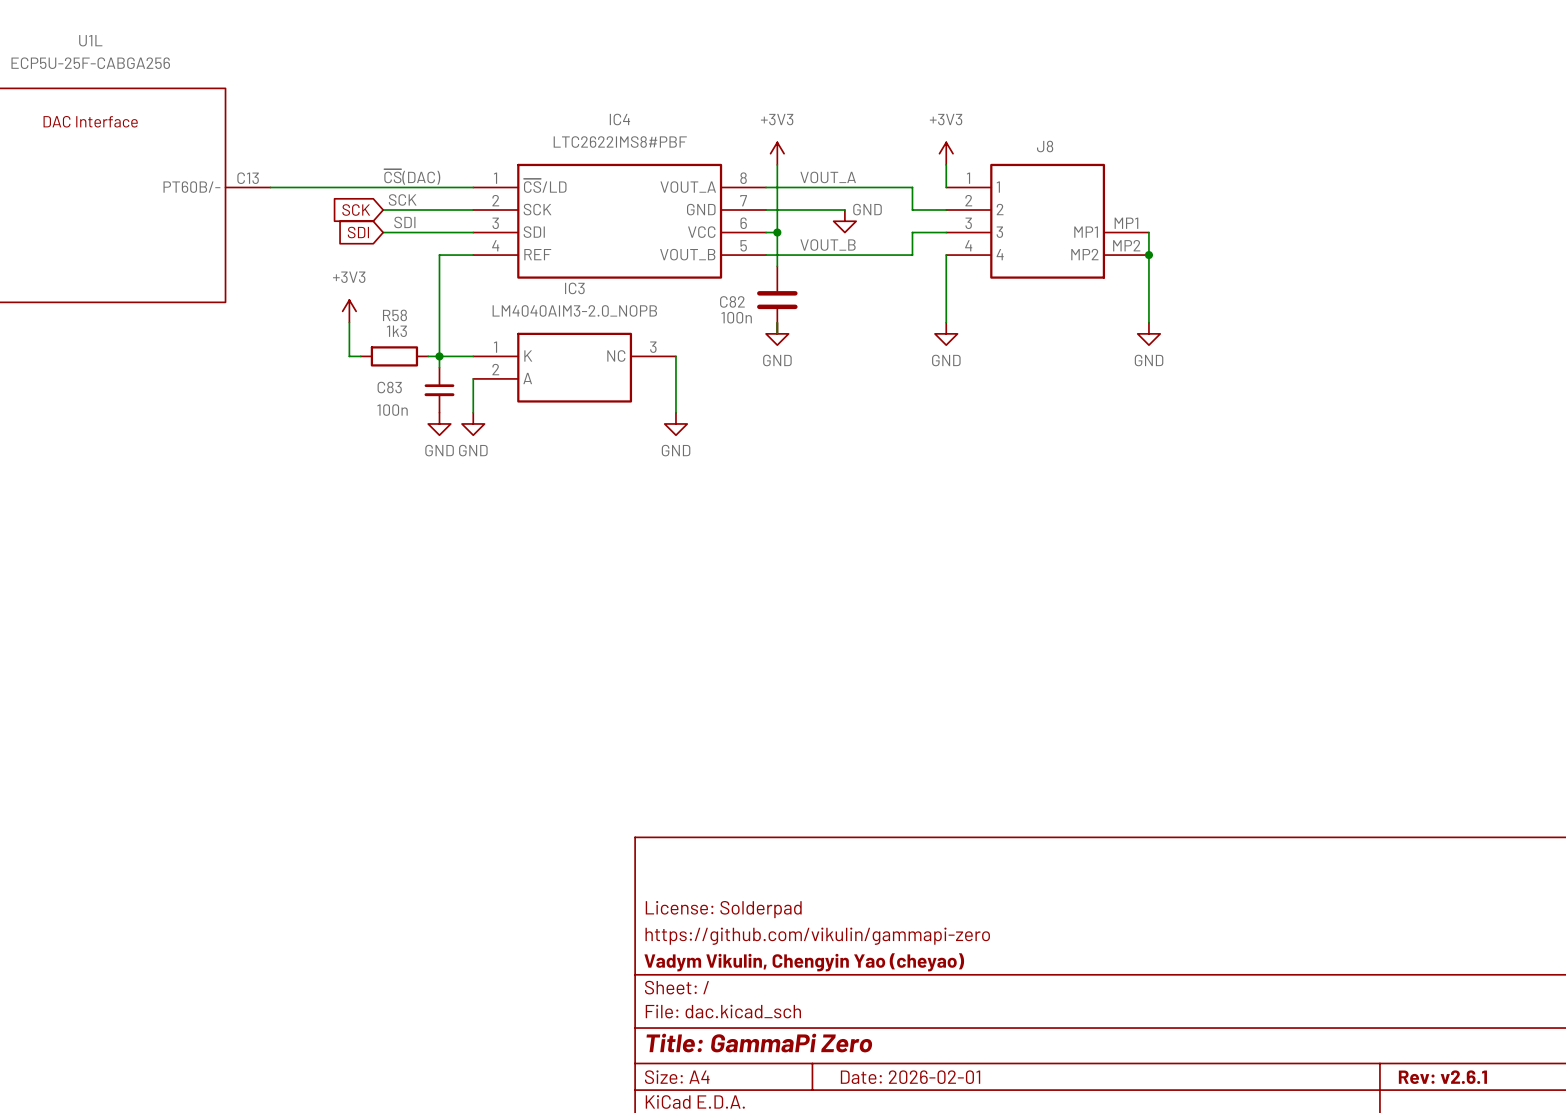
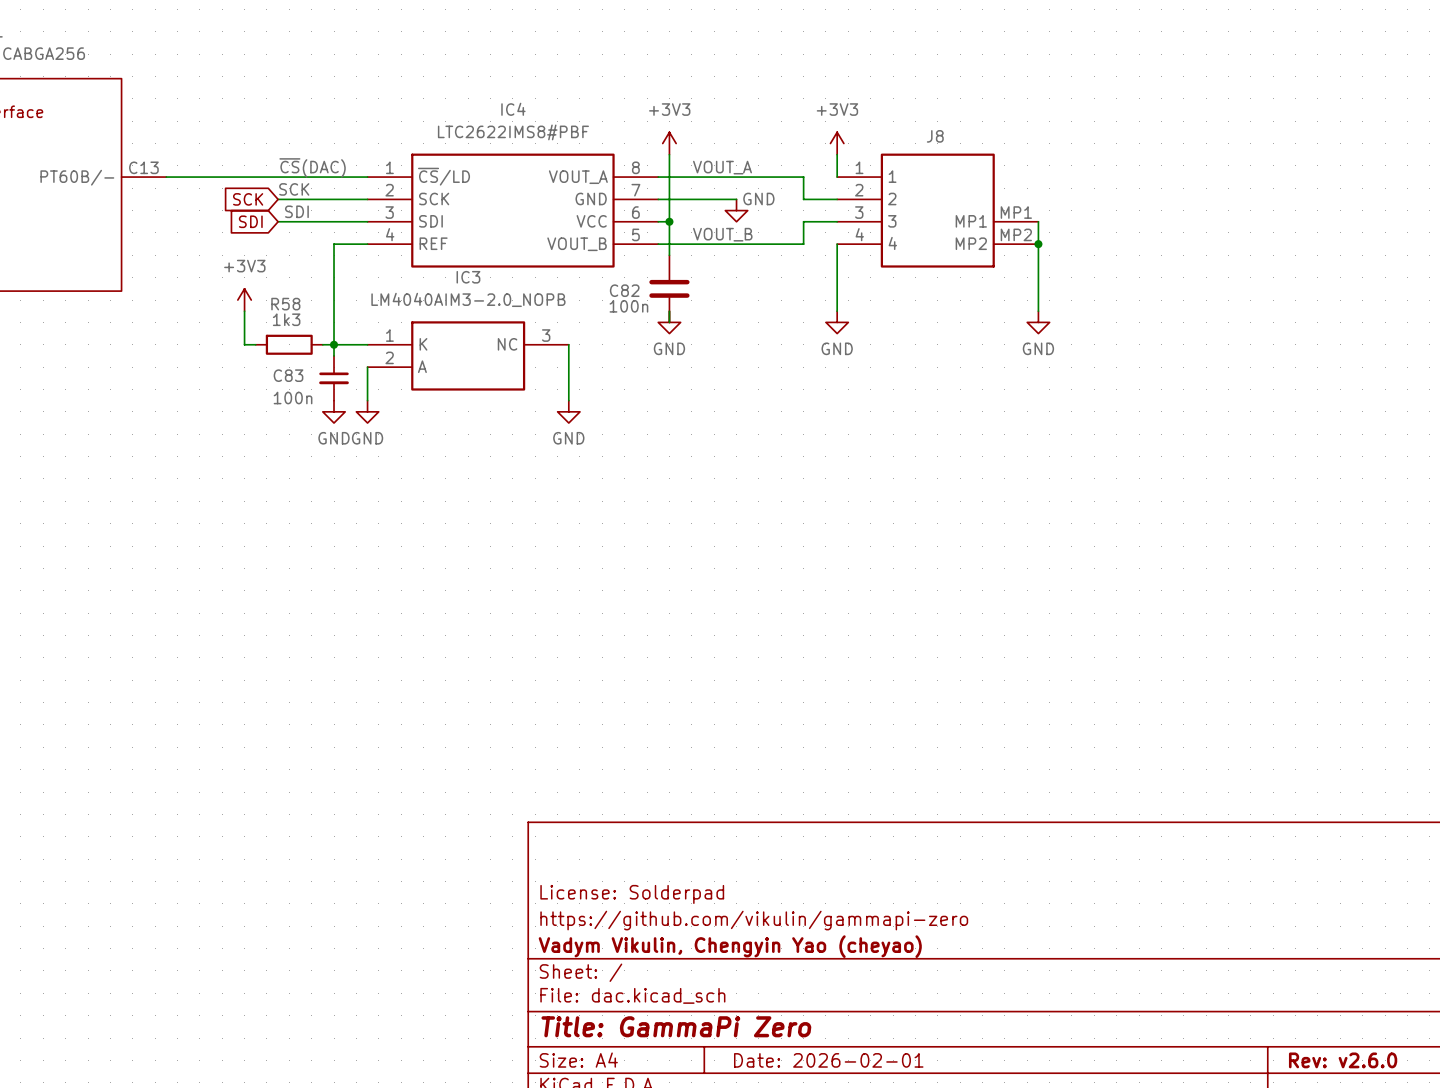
title block: Rev: v2.6.1 (1442, 1077) -> Rev: v2.6.0 (1343, 1060)

